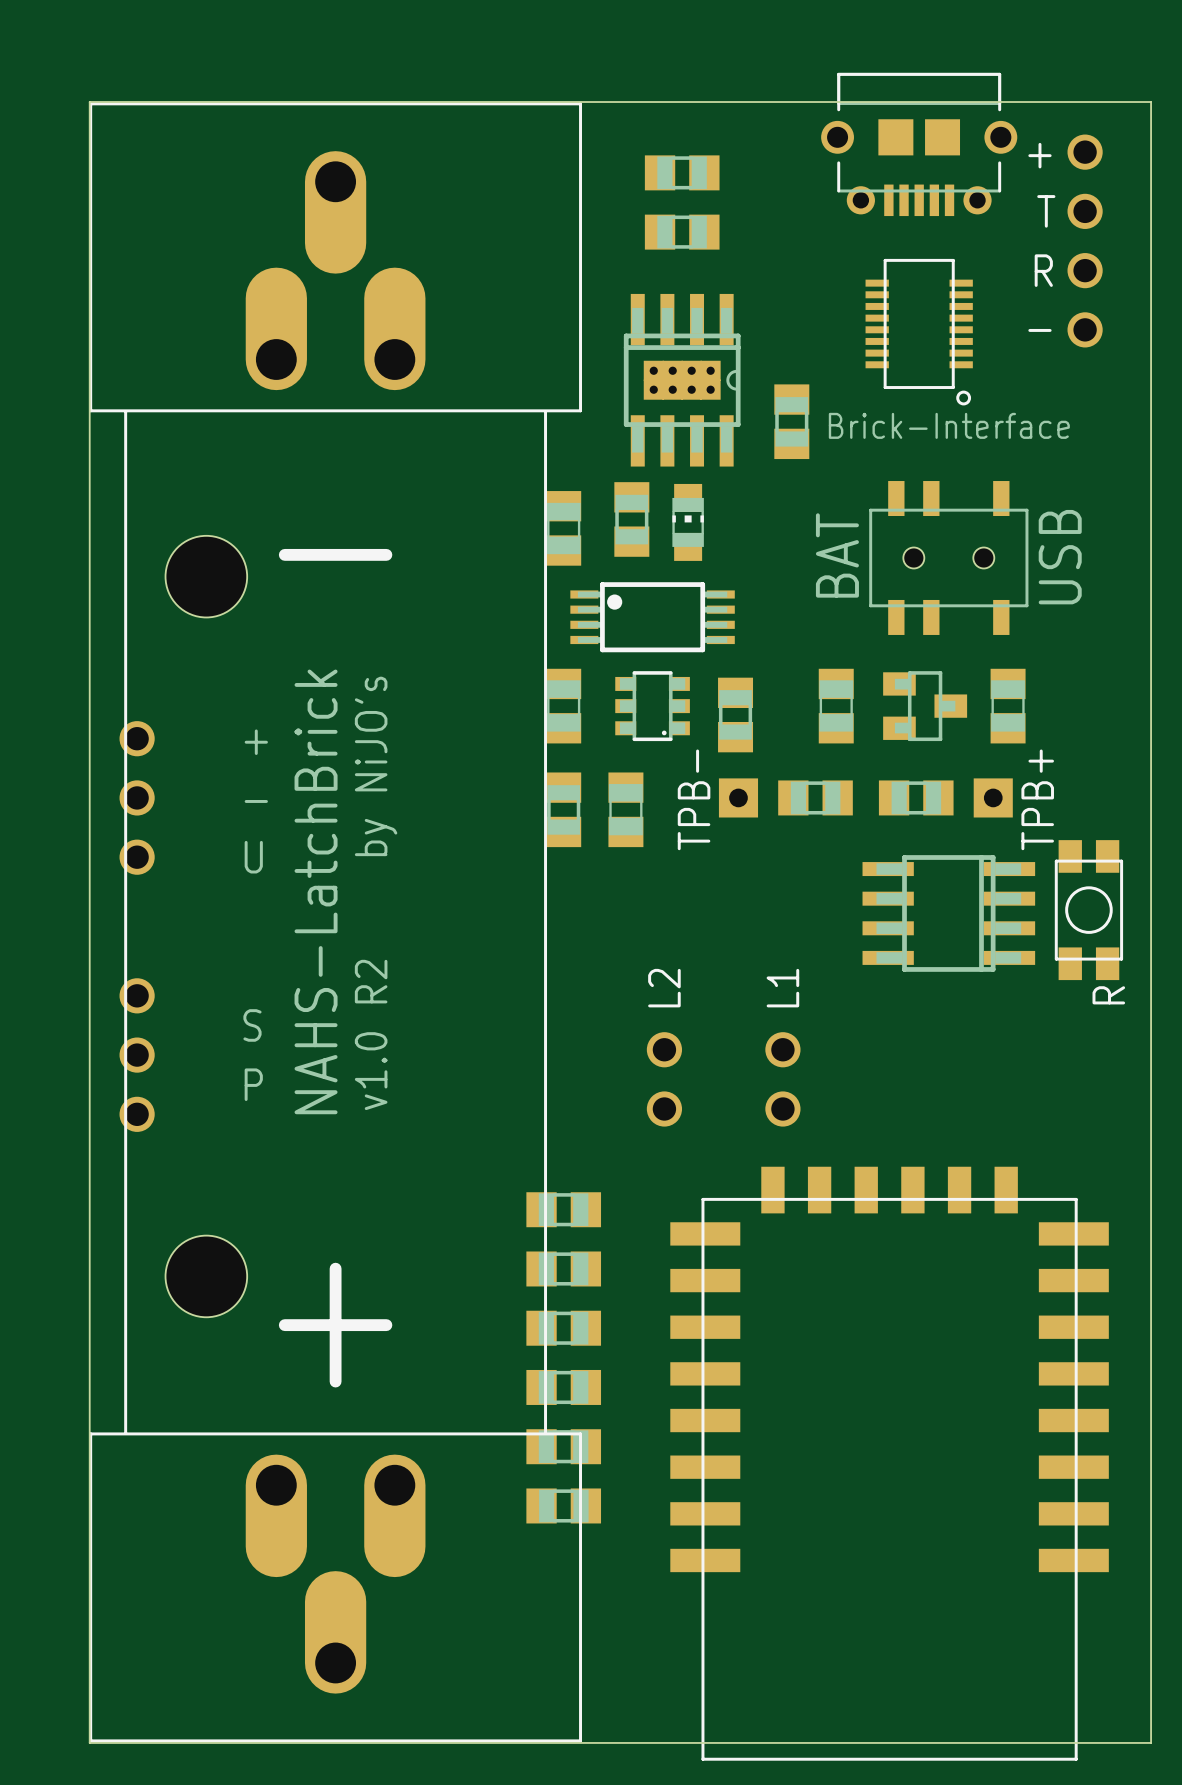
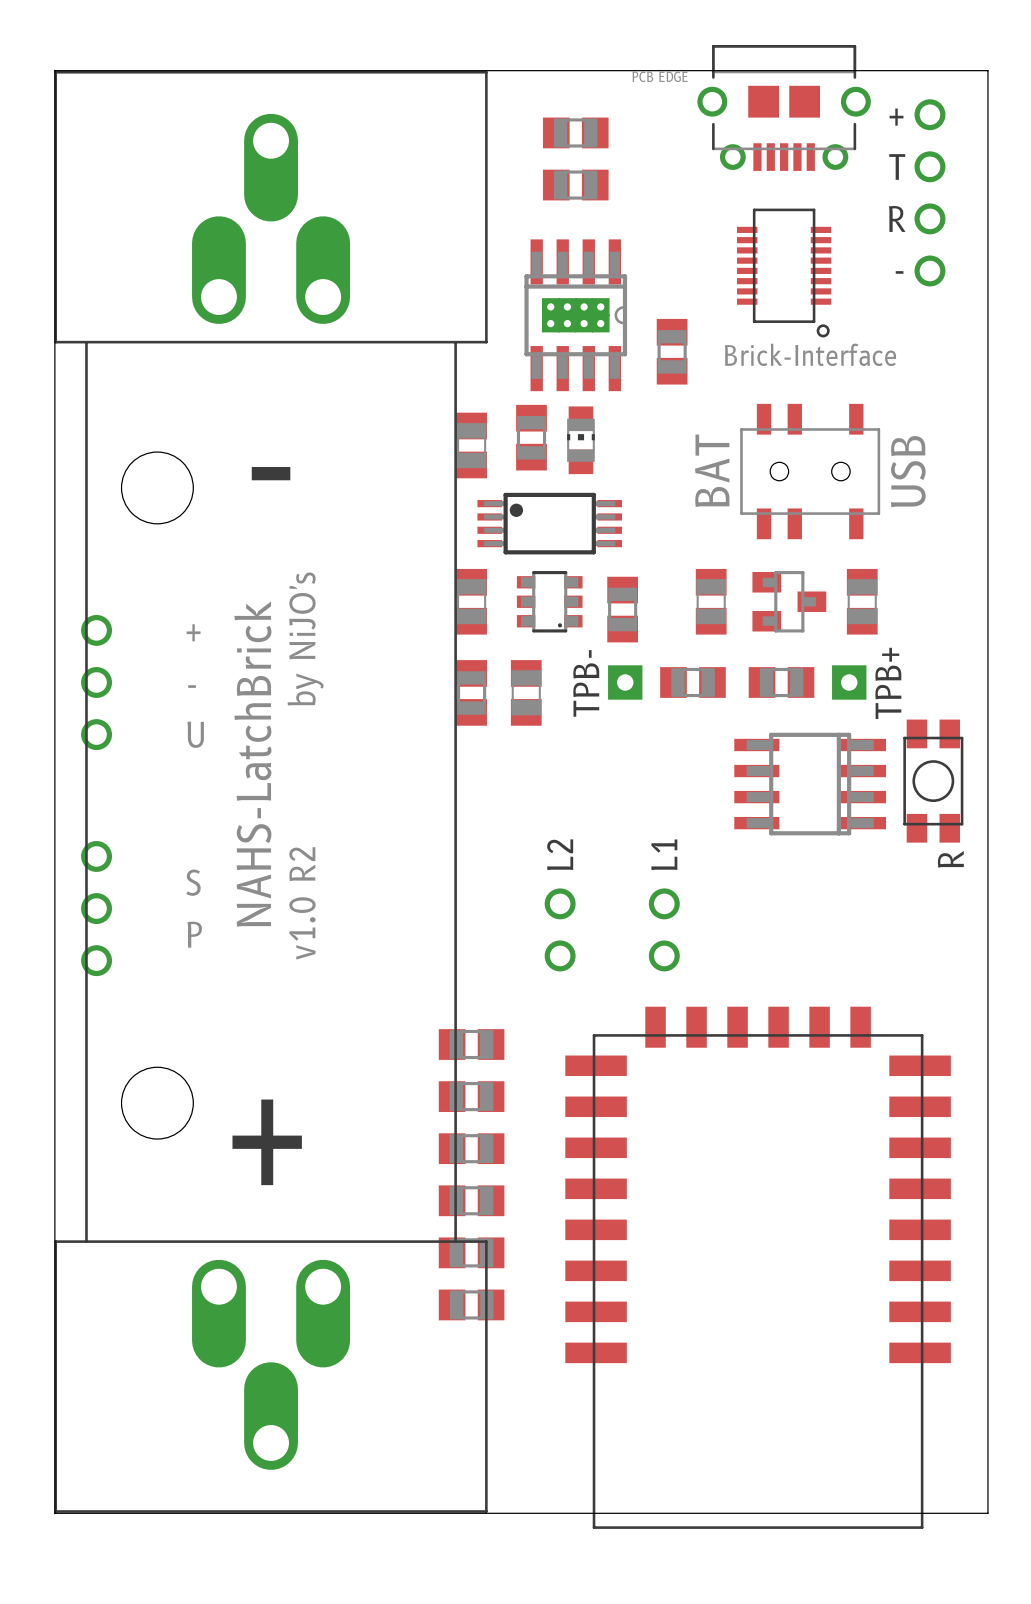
part footprint: [821, 72, 1018, 217] -> [697, 45, 871, 171]

